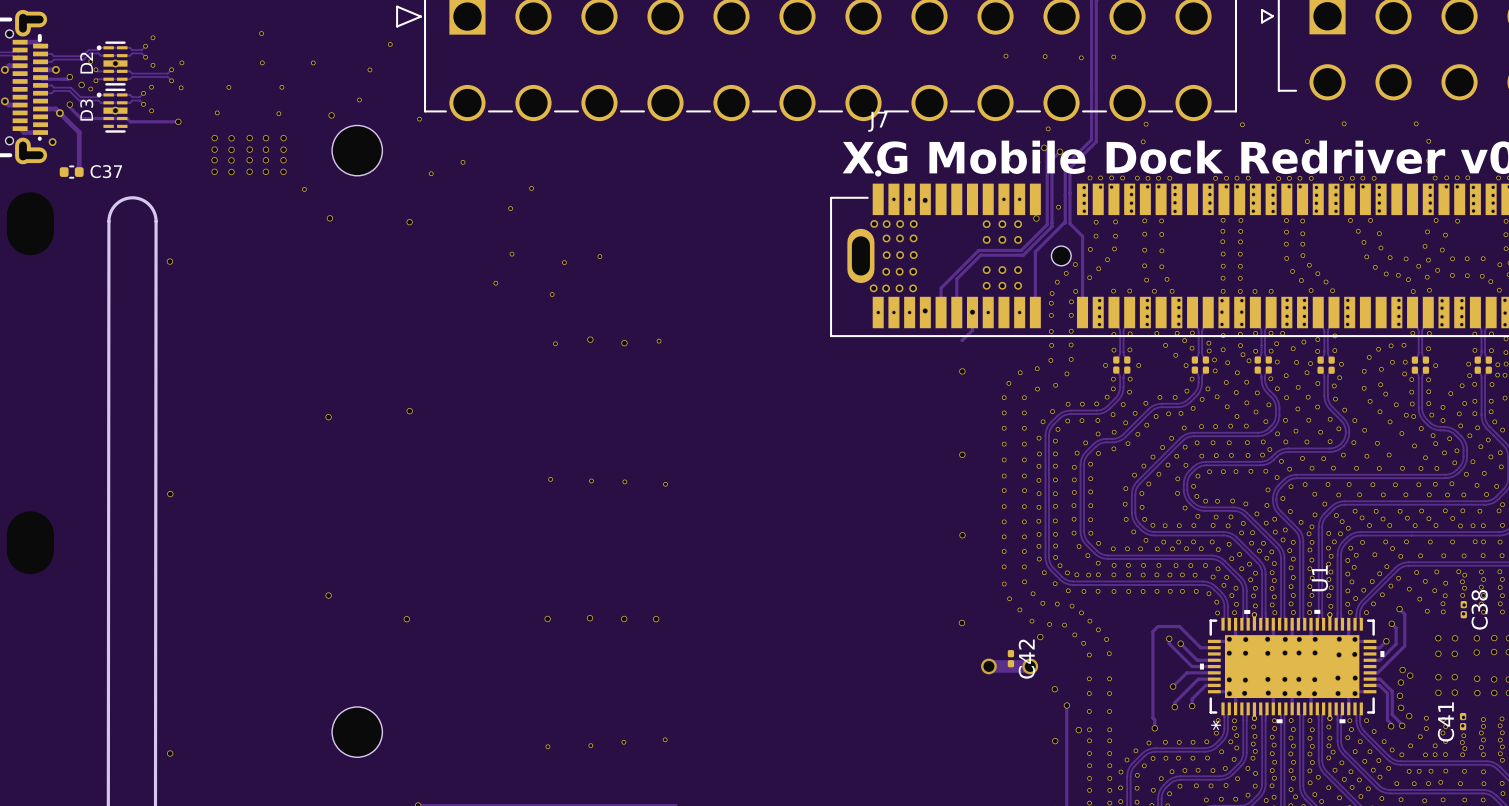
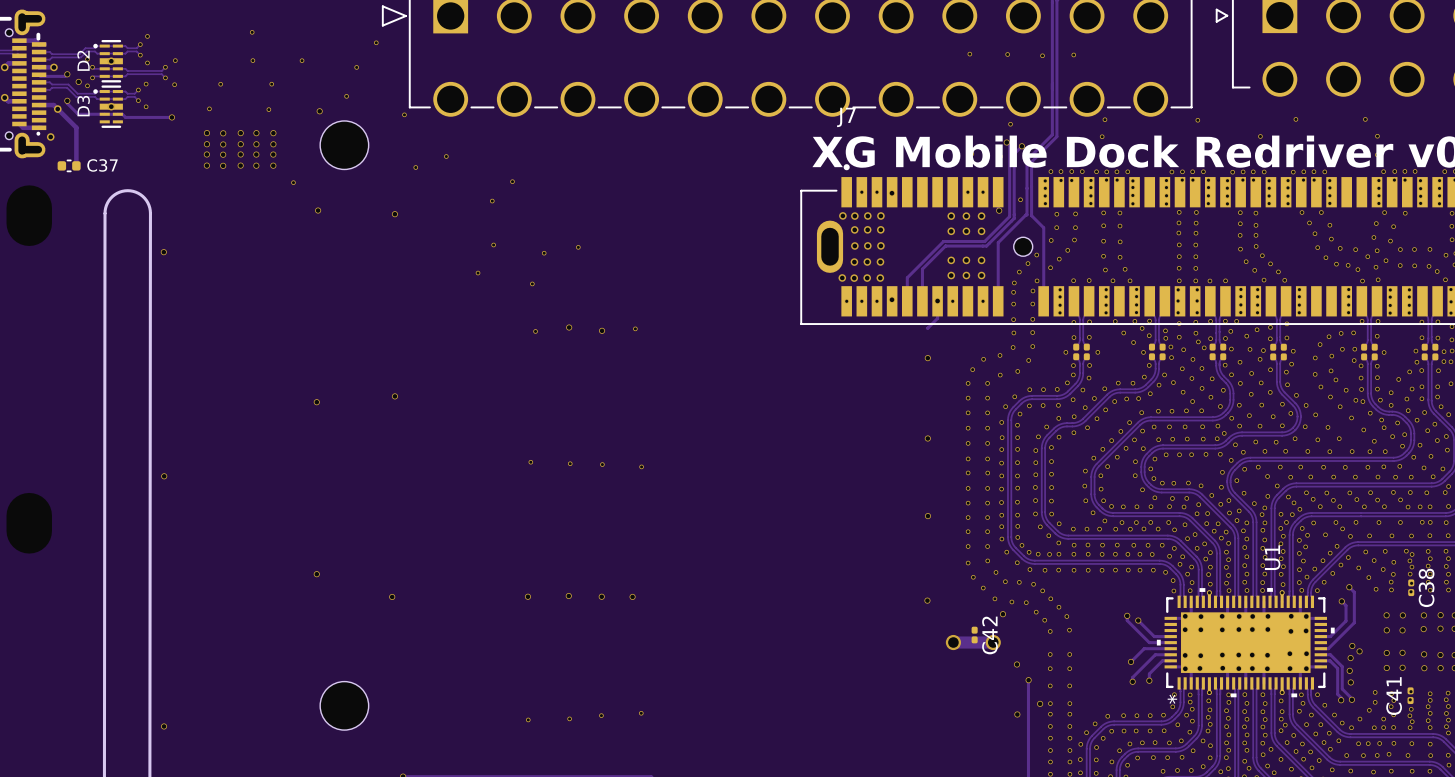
track: (1386, 641) (1379, 647) (1370, 647) -> none
via: (1386, 641) -> none
track: (1214, 647) (1200, 647) (1179, 626) (1158, 626) (1152, 631) (1152, 717) (1154, 719) (1154, 728) -> none
via: (1409, 716) -> none
via: (1154, 728) -> none

